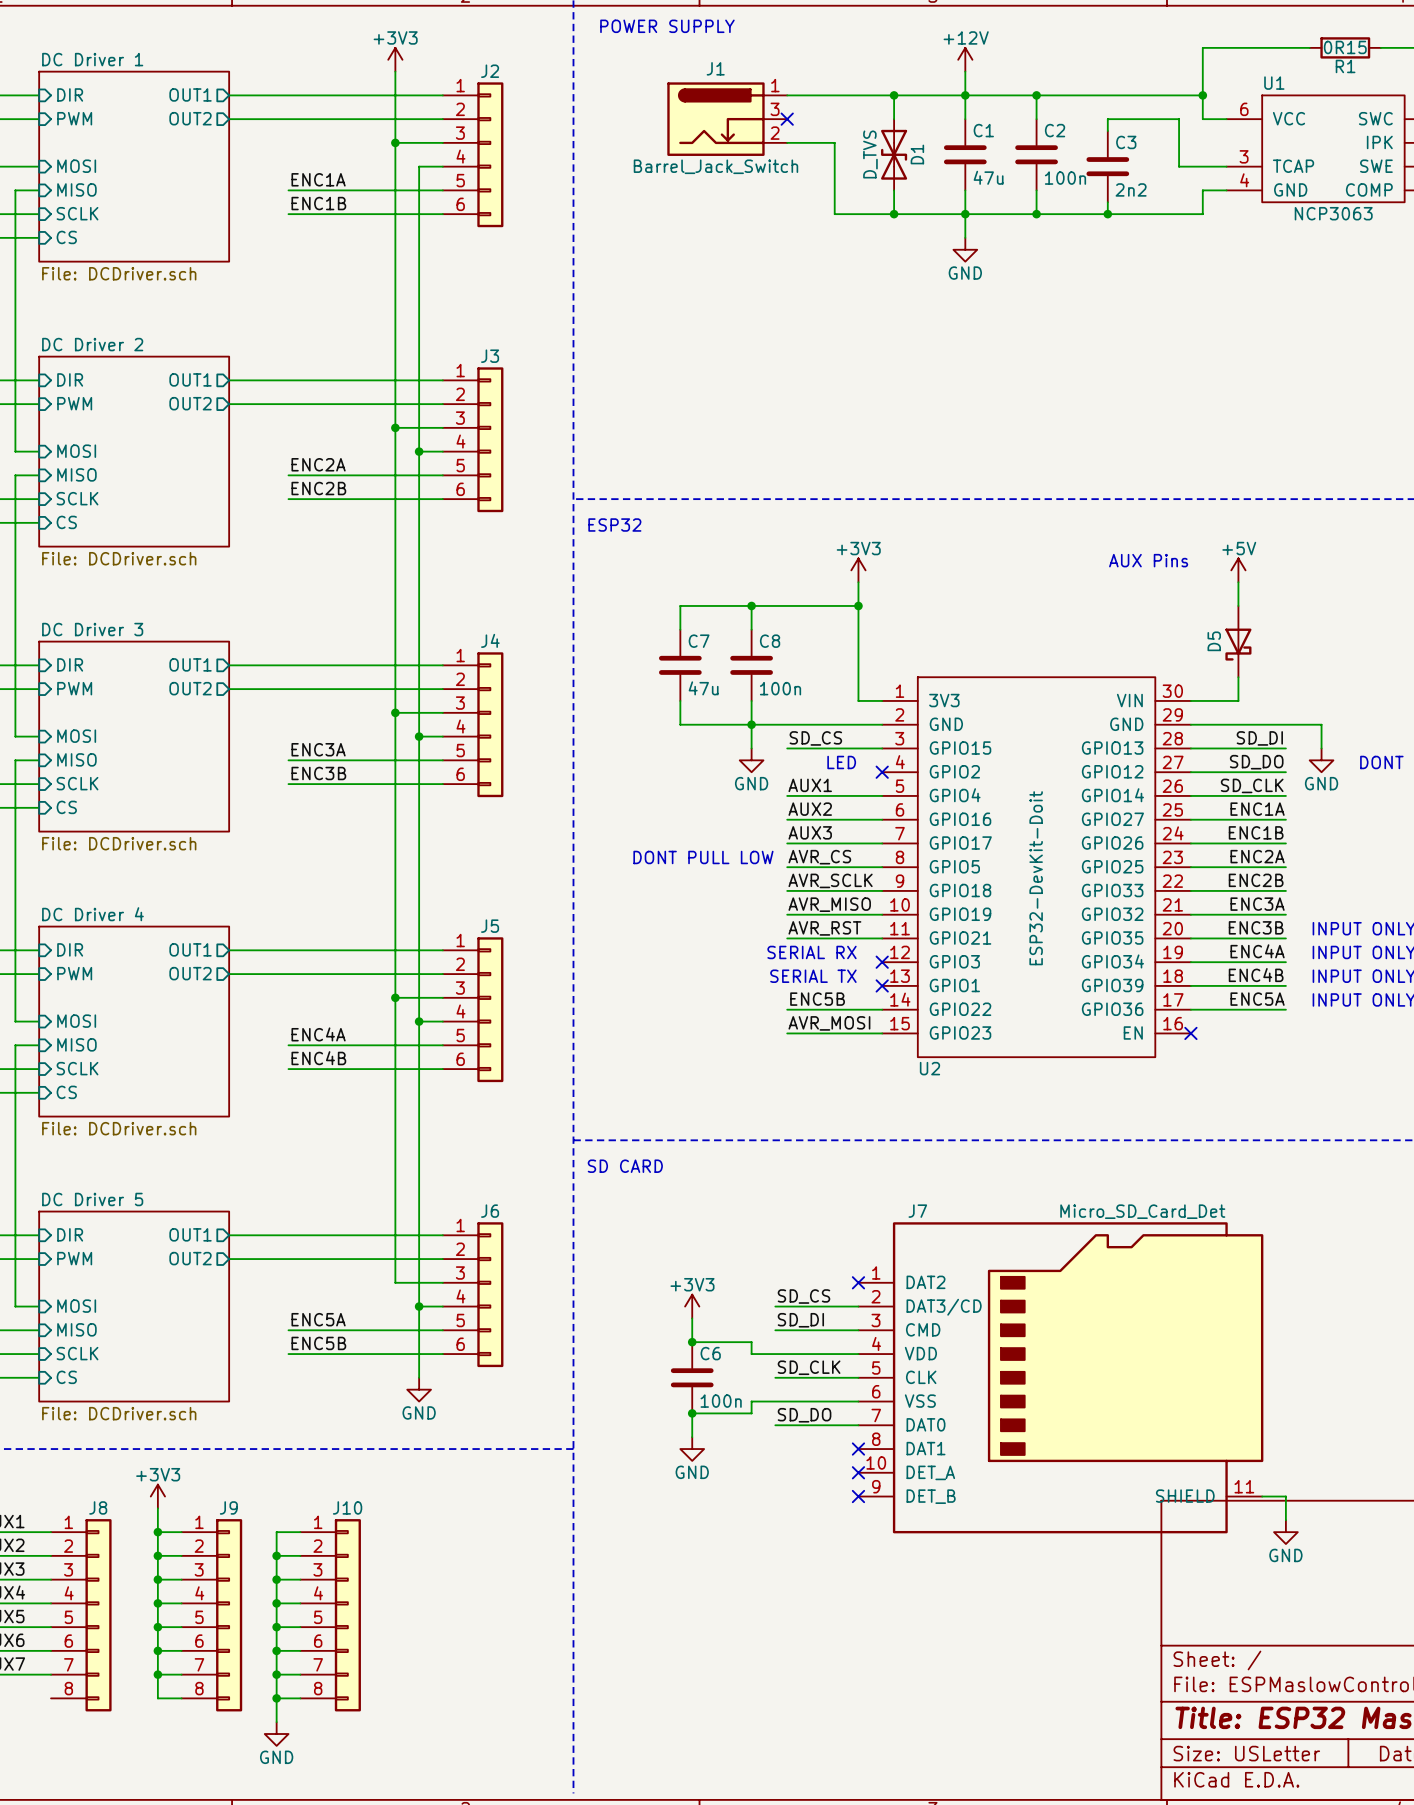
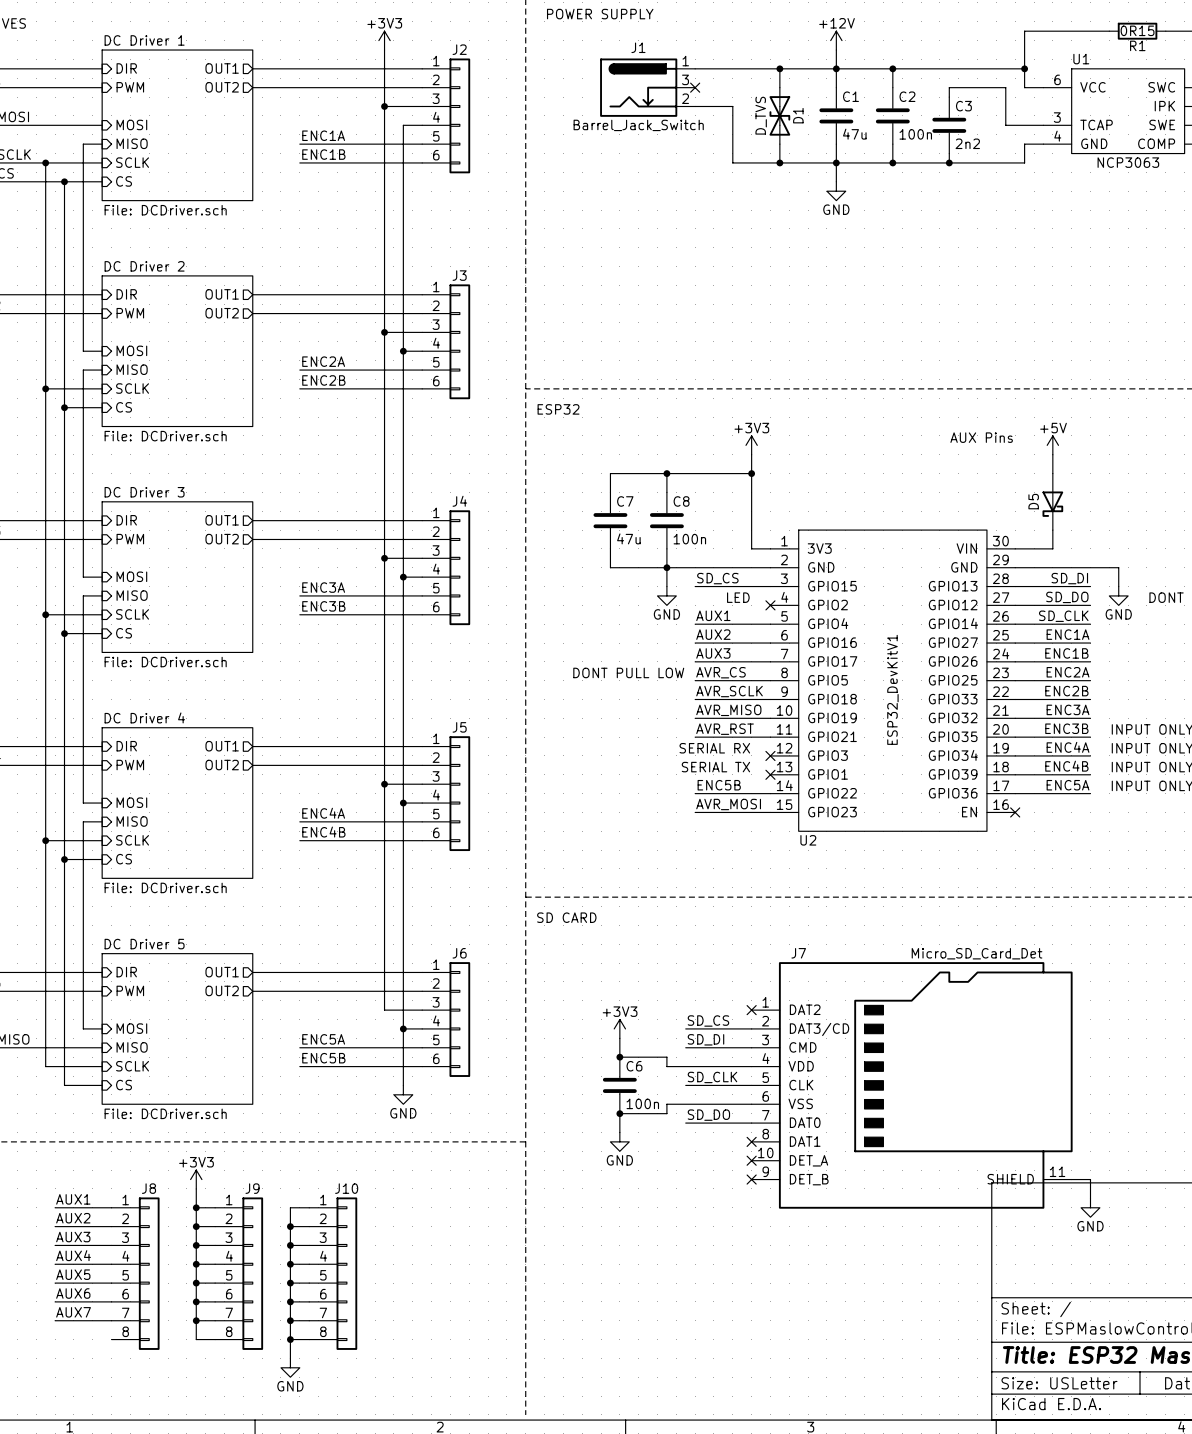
U2 value: ESP32-DevKit-Doit (1036, 878) -> ESP32_DevKitV1 (892, 689)

